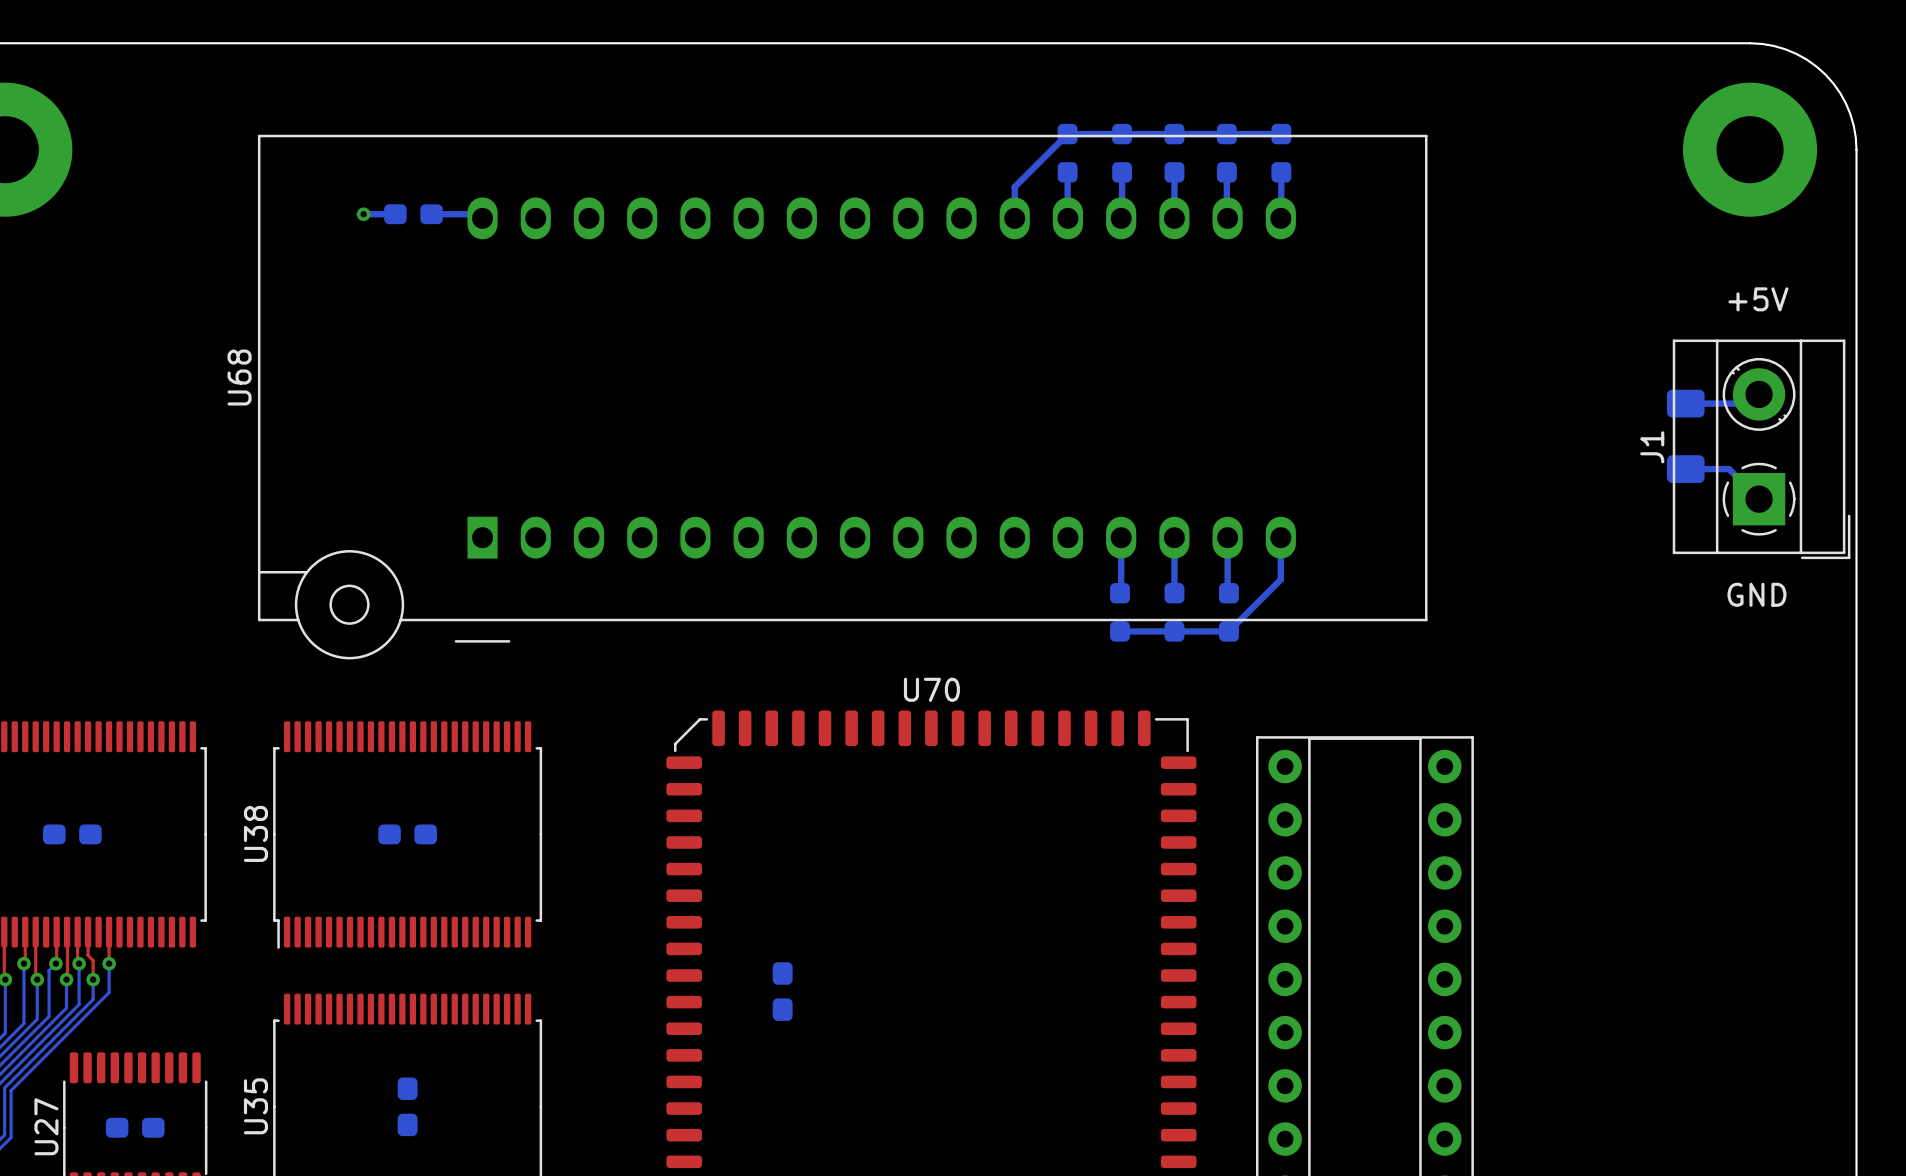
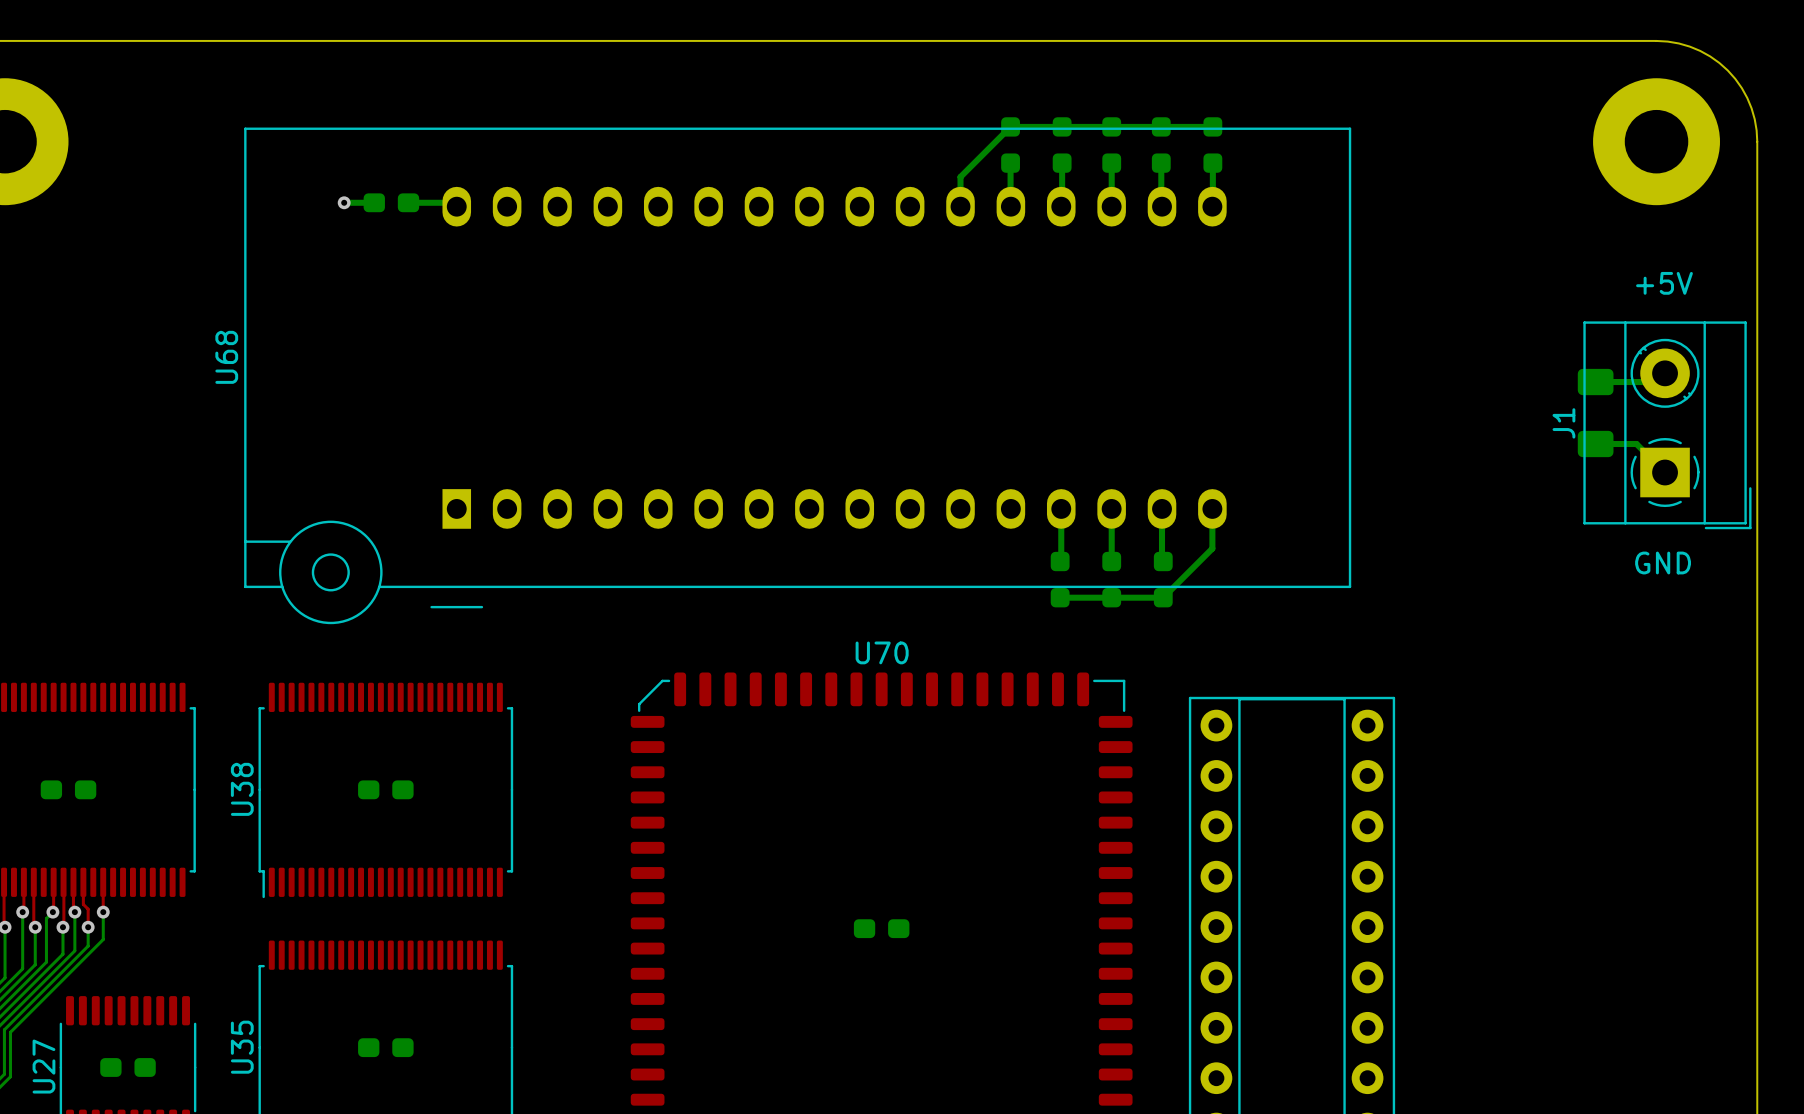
part rotation: 0° (782, 991) -> 90° clockwise (881, 928)
part position: (782, 991) -> (881, 928)
part rotation: 0° (407, 1106) -> 90° clockwise (385, 1047)

